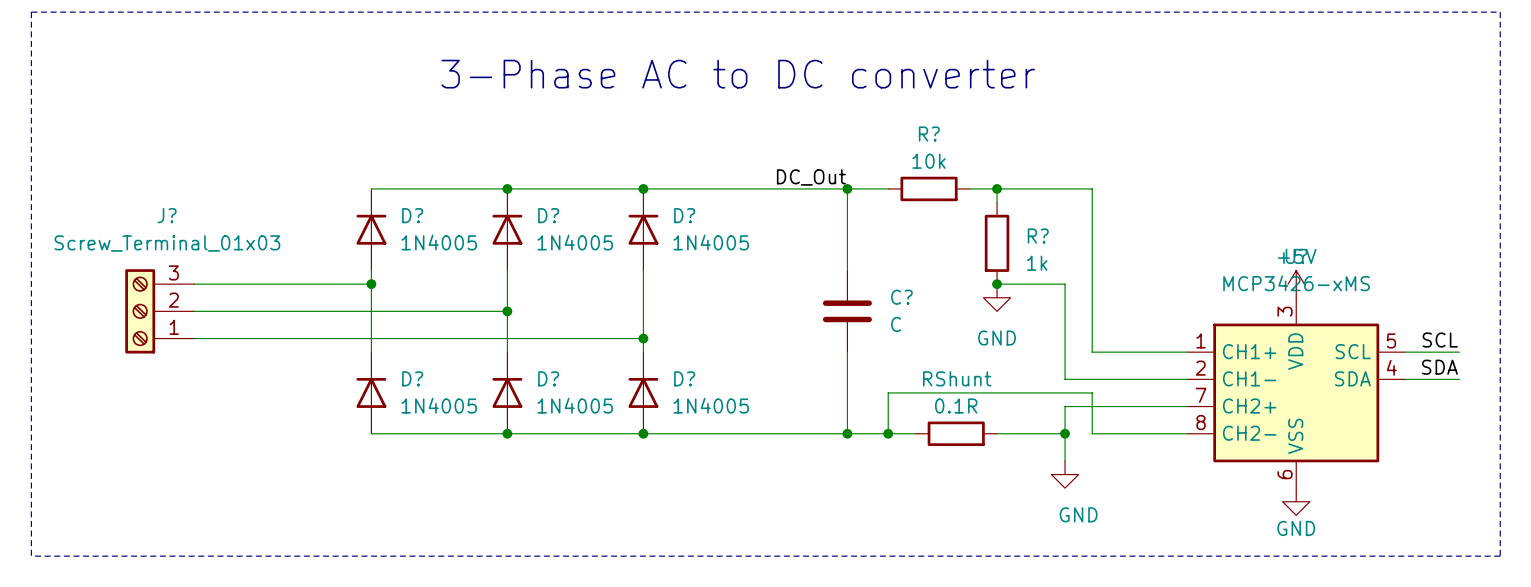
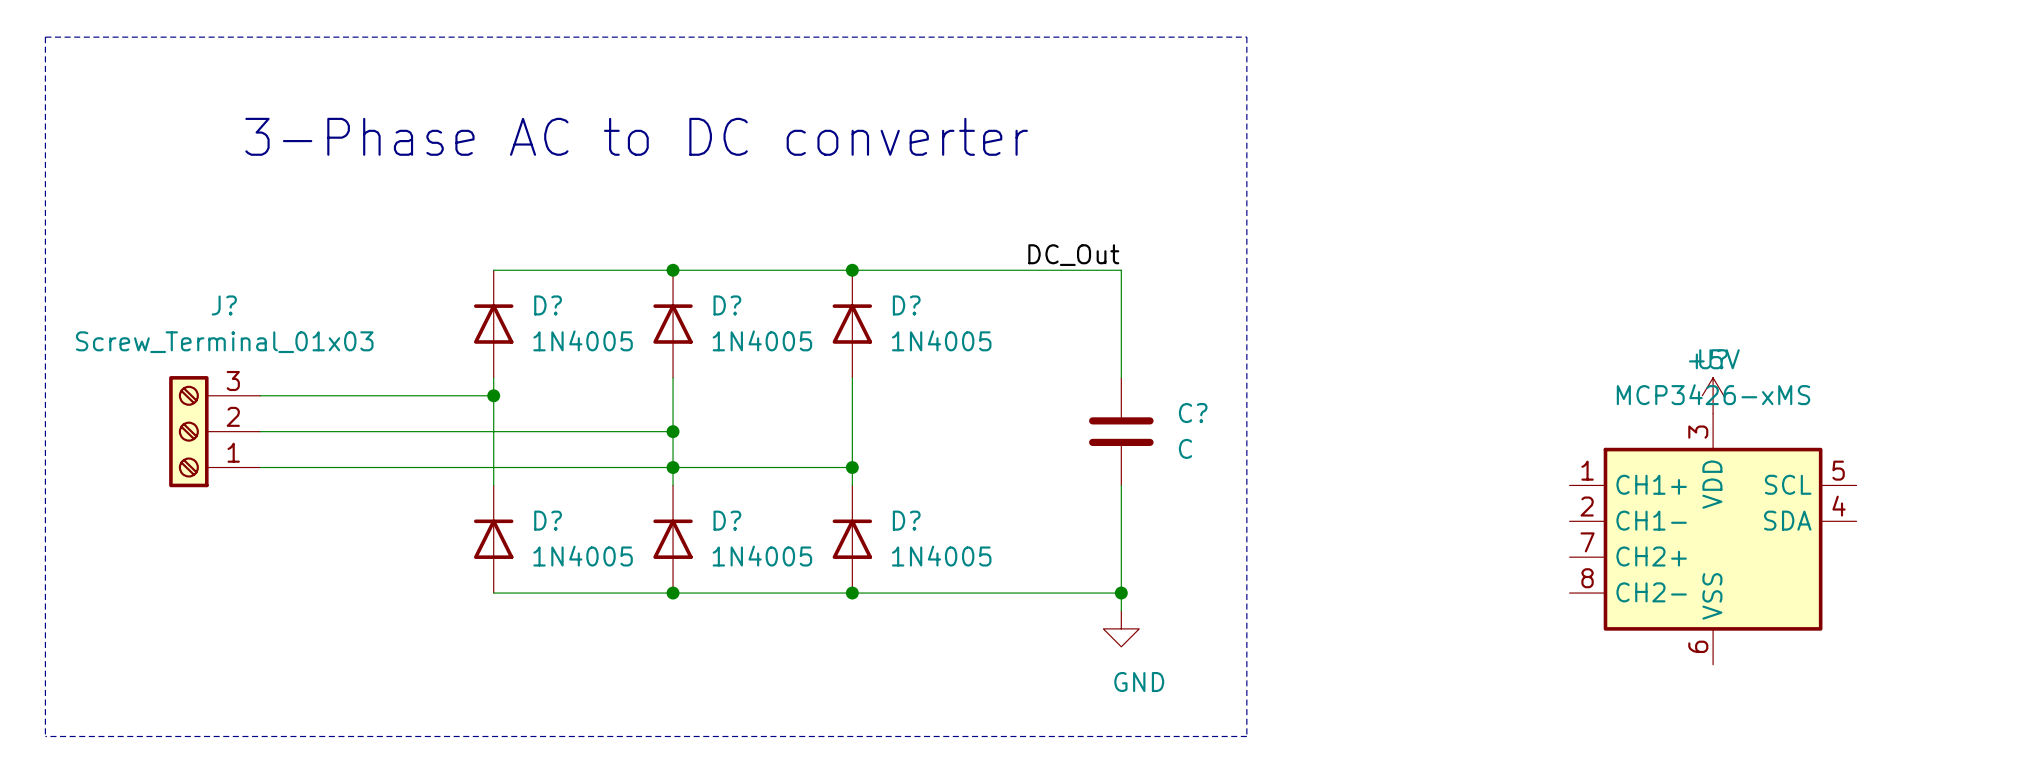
line: (942, 12) (1500, 12) (1500, 556) (31, 556) (31, 542) -> (1246, 37) (1246, 736) (45, 736)
text position: 3-Phase AC to DC converter (738, 74) -> 3-Phase AC to DC converter (636, 136)
wire: (847, 188) (888, 188) -> none
junction: (847, 188) -> none
R?: 10k (929, 188) -> none
wire: (969, 188) (1092, 188) (1092, 352) (1187, 352) -> none
wire: (997, 188) (997, 202) -> none
junction: (997, 188) -> none
R?: 1k (997, 243) -> none
wire: (997, 284) (1065, 284) (1065, 379) (1187, 379) -> none
junction: (997, 284) -> none
power symbol: GND (997, 297) -> none
junction: none -> (673, 467)
label: SCL (1440, 340) -> none
wire: (1405, 352) (1459, 352) -> none
label: SDA (1439, 367) -> none
wire: (1405, 379) (1459, 379) -> none
wire: (1187, 406) (1065, 406) (1065, 460) -> none
wire: (847, 433) (915, 433) -> (1121, 593) (1121, 610)
wire: (888, 433) (888, 392) (1092, 392) (1092, 433) (1187, 433) -> none
junction: (888, 433) -> none
RShunt: 0.1R (956, 433) -> none
wire: (997, 433) (1065, 433) -> none
junction: (1065, 433) -> none
power symbol: none -> GND (1121, 628)
power symbol: GND (1065, 474) -> none
power symbol: GND (1296, 501) -> none

